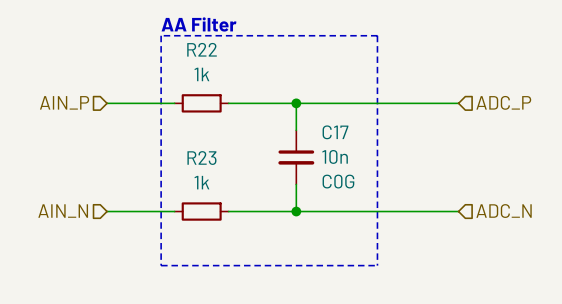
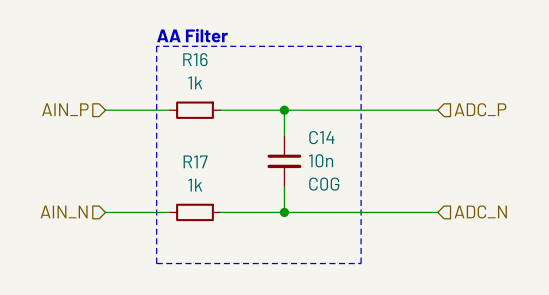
R22 name: R22 (202, 49) -> R16 (195, 59)
C17 name: C17 (335, 132) -> C14 (321, 137)
R23 name: R23 (201, 158) -> R17 (195, 161)

